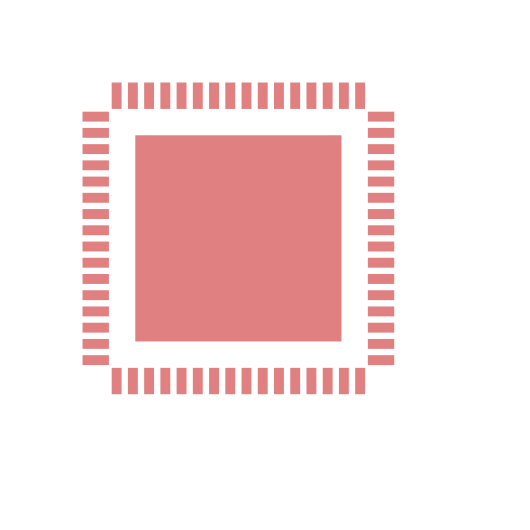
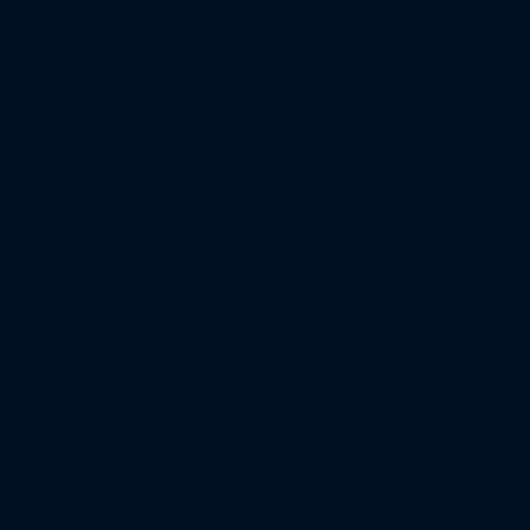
part: (238, 238) -> none

